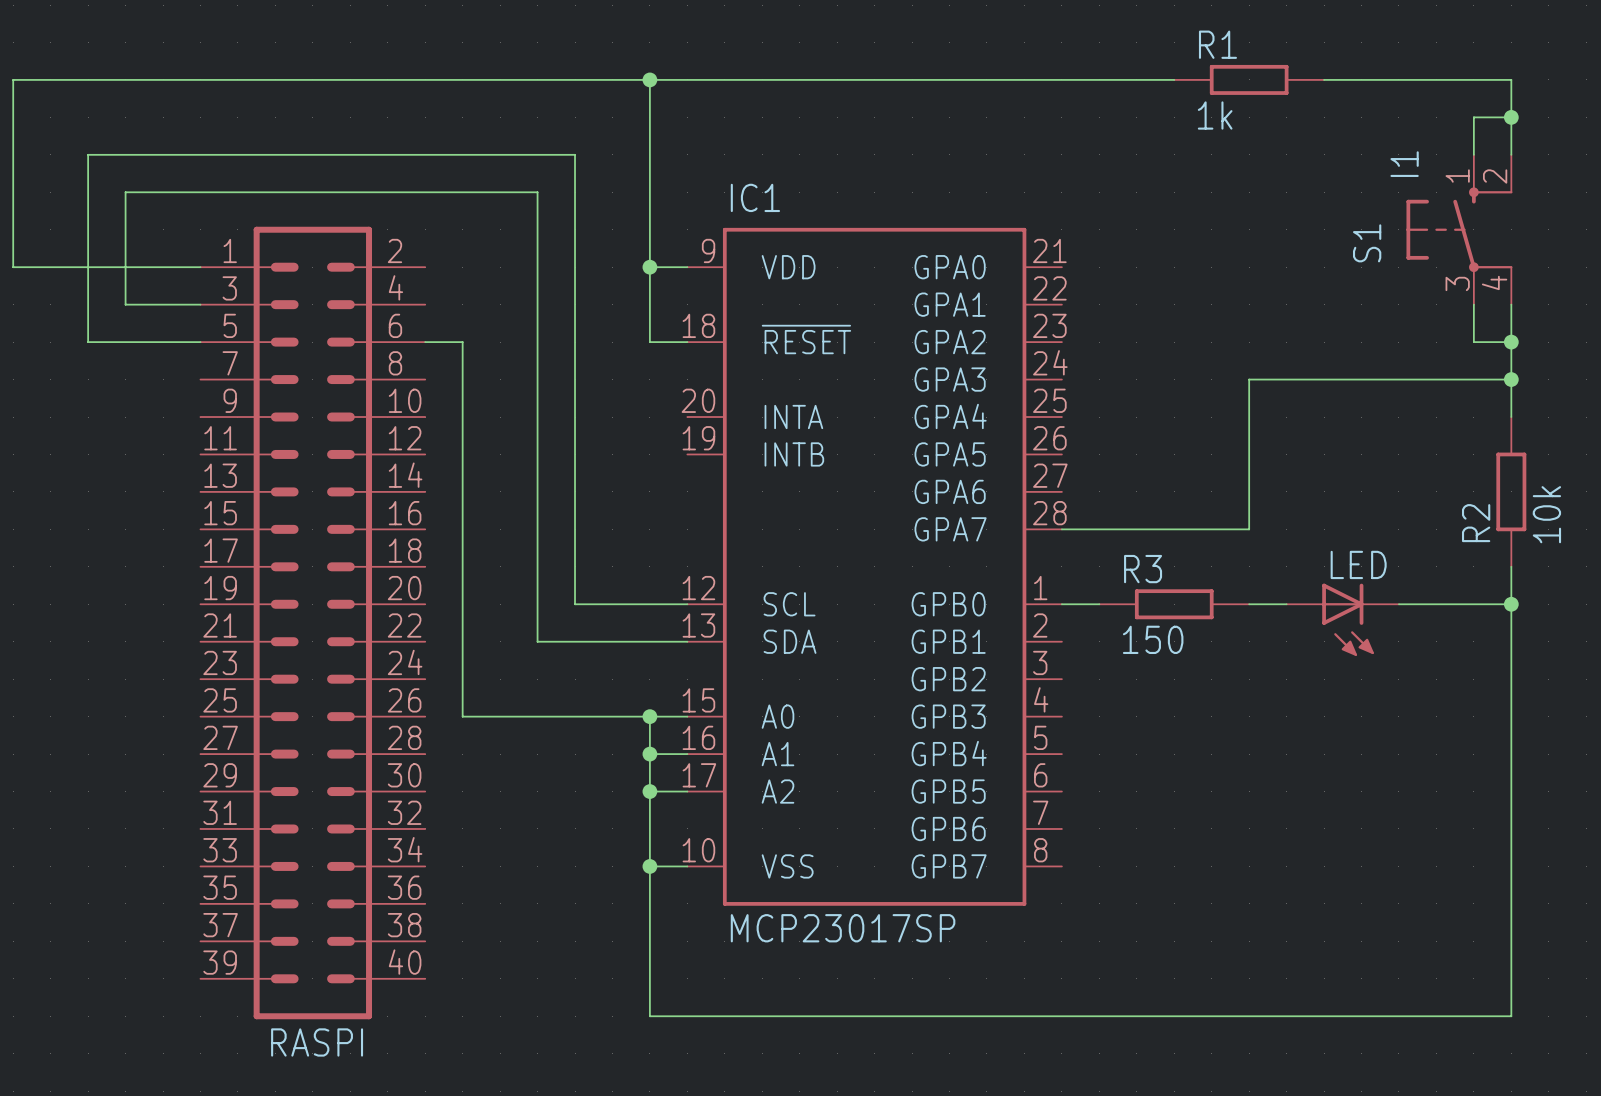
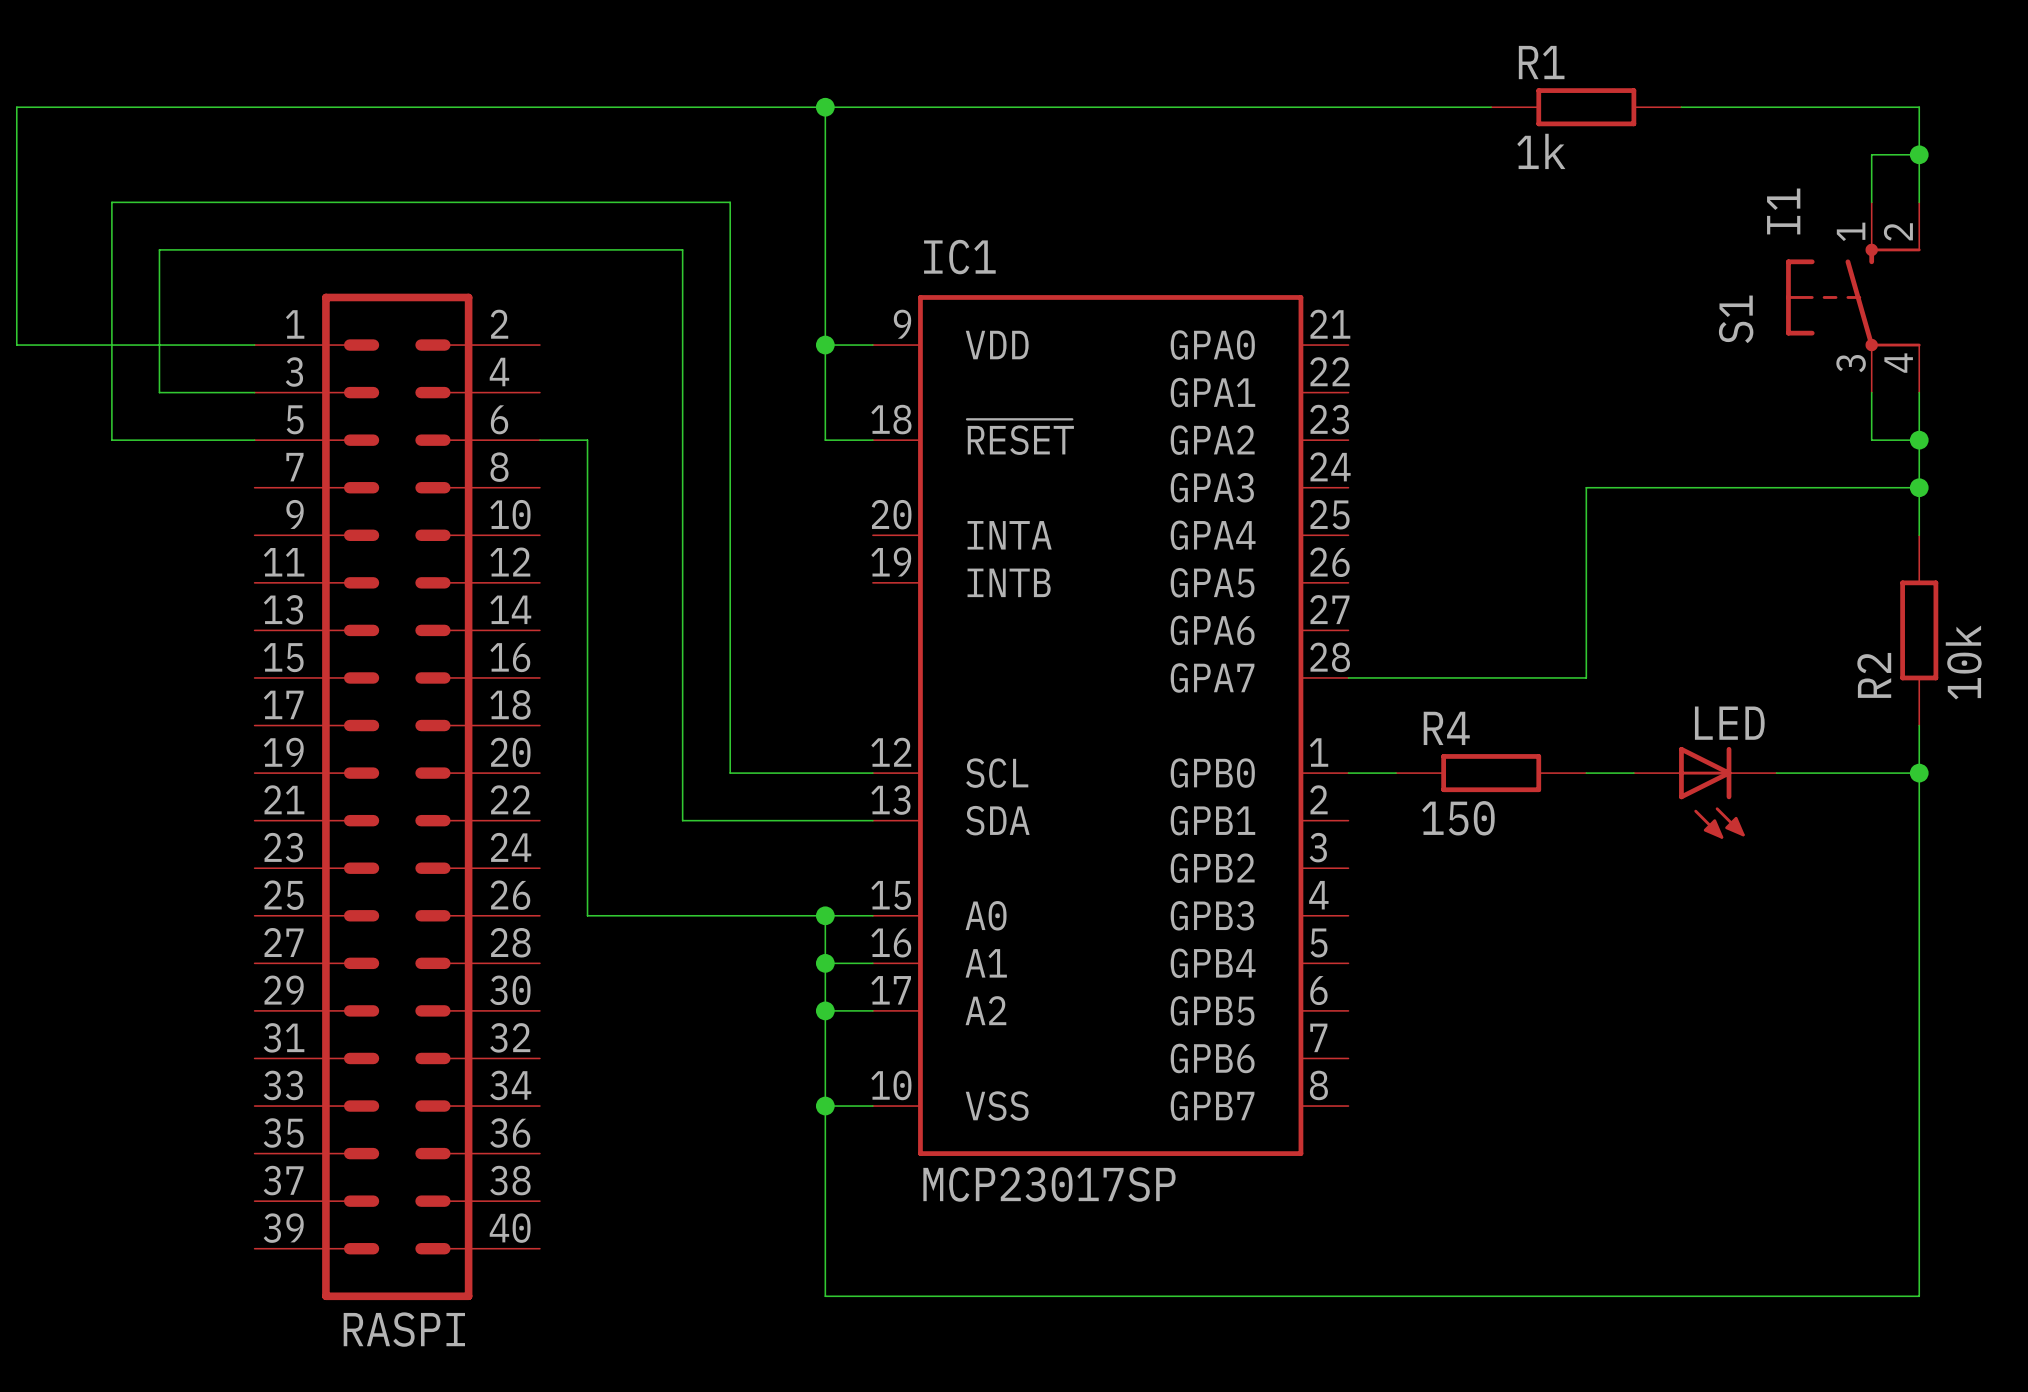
R3 name: R3 (1143, 569) -> R4 (1446, 728)

